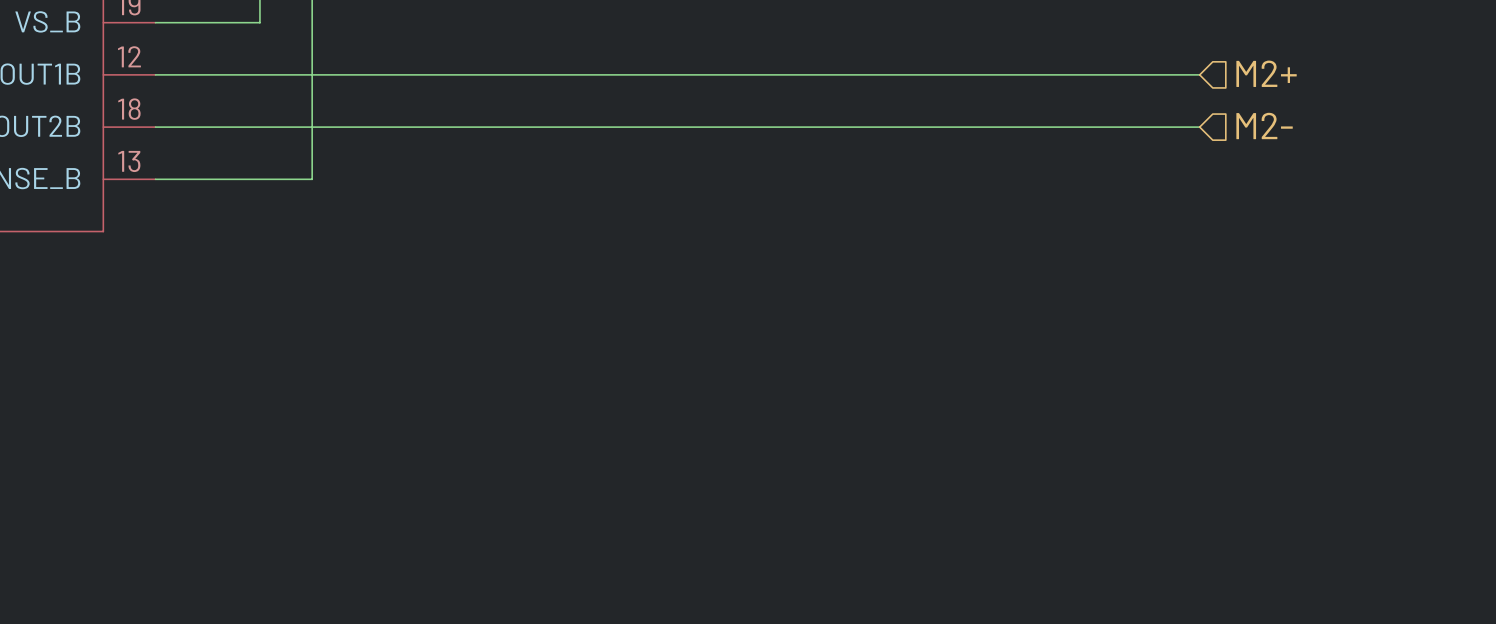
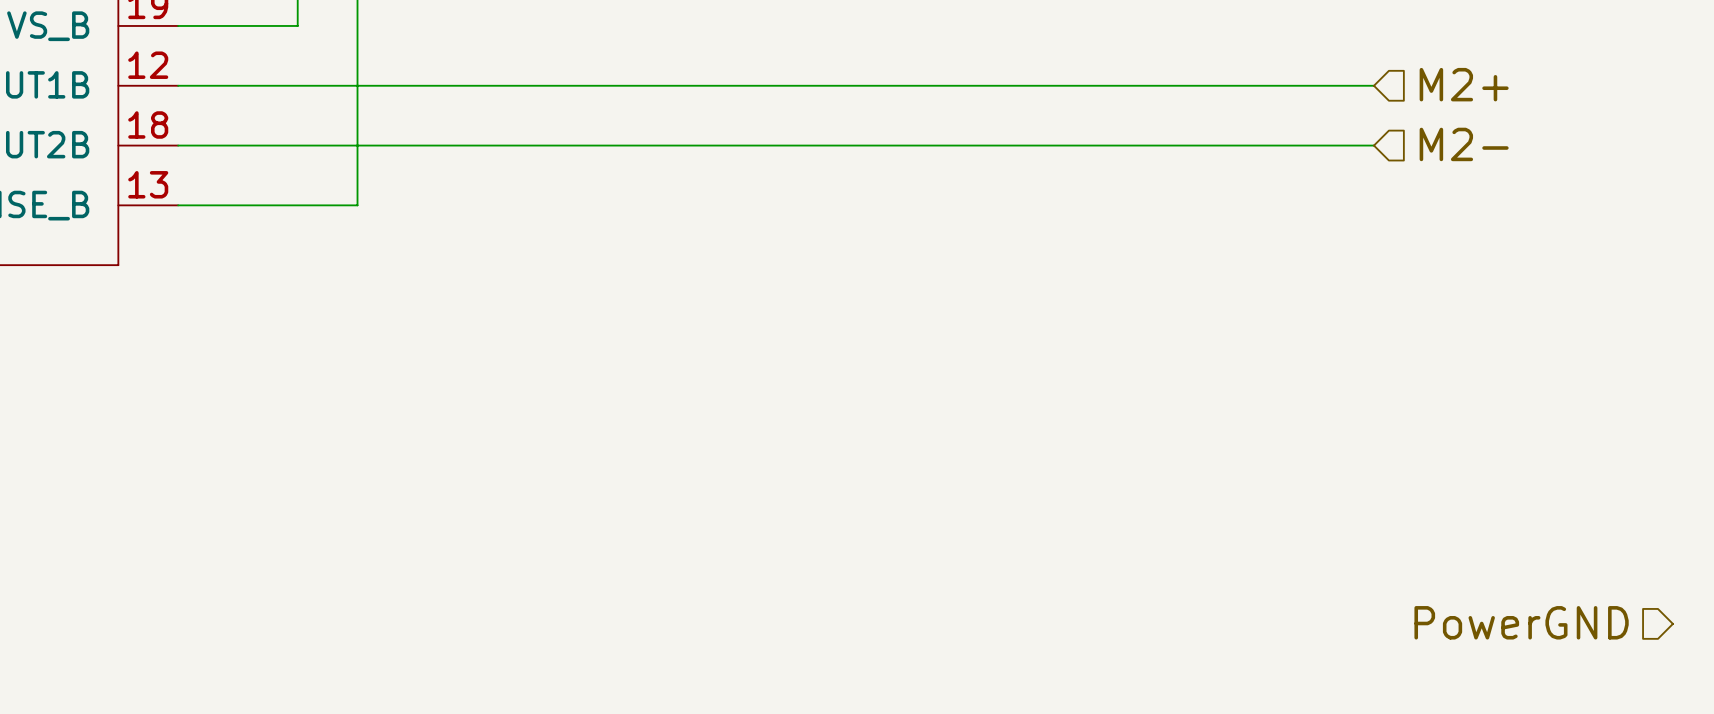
hierarchical label: none -> PowerGND (1521, 622)

